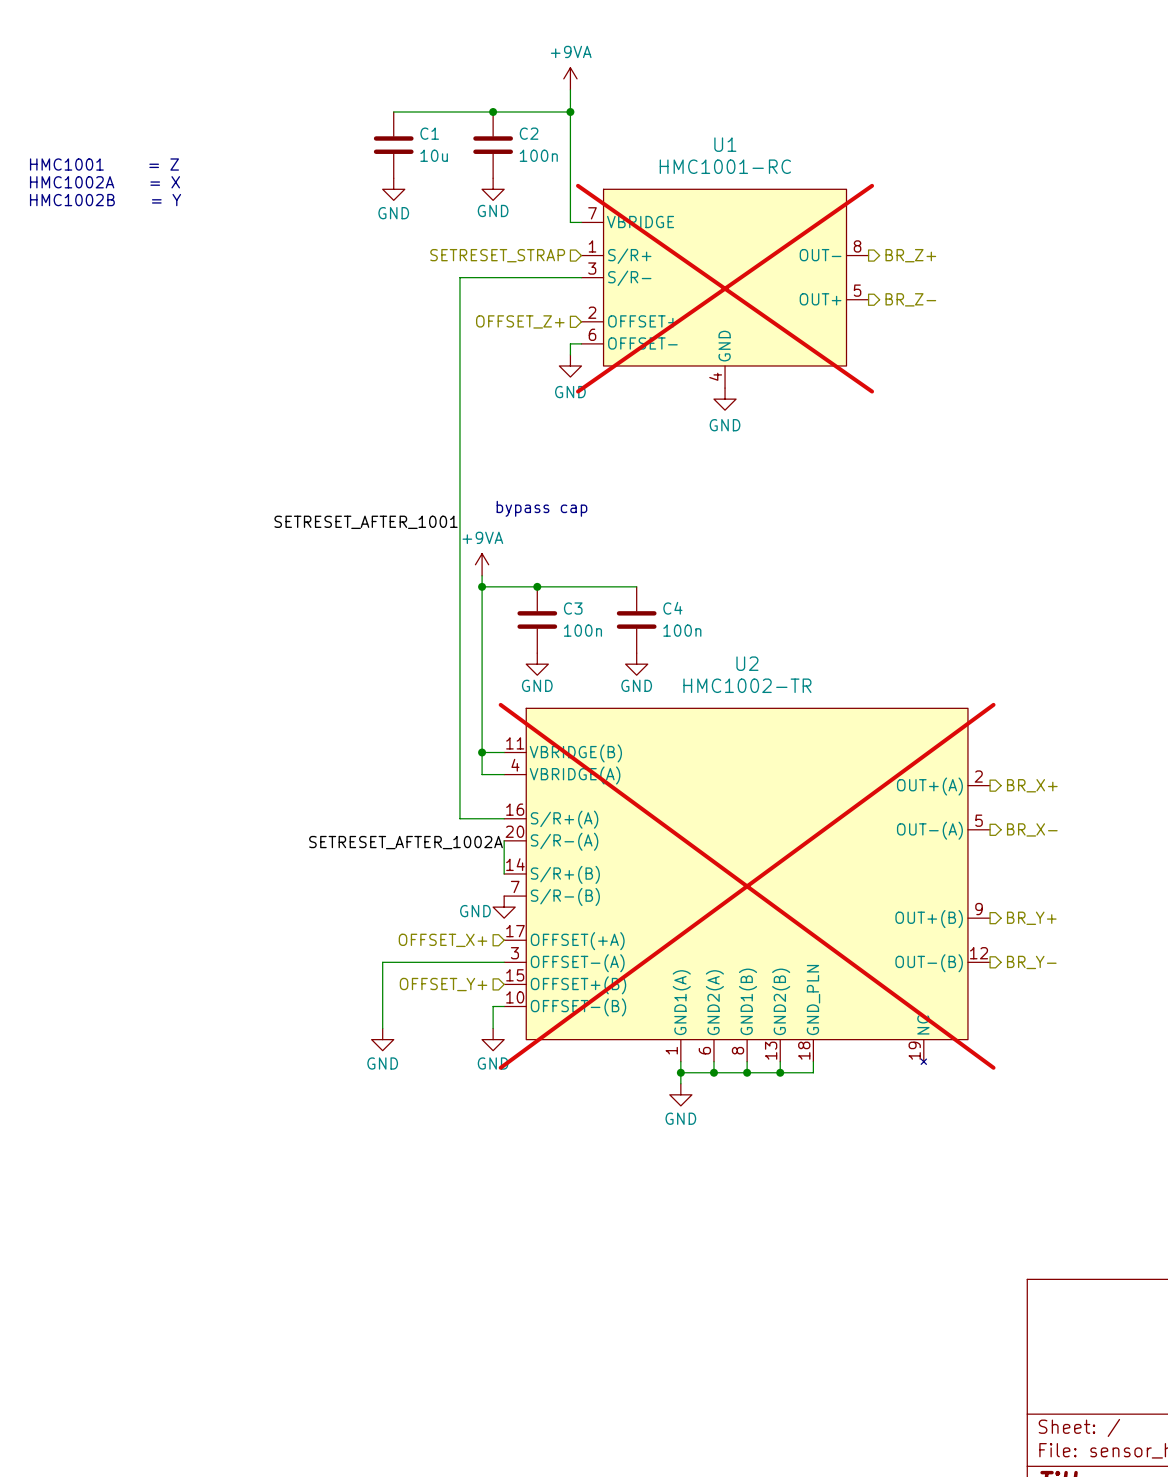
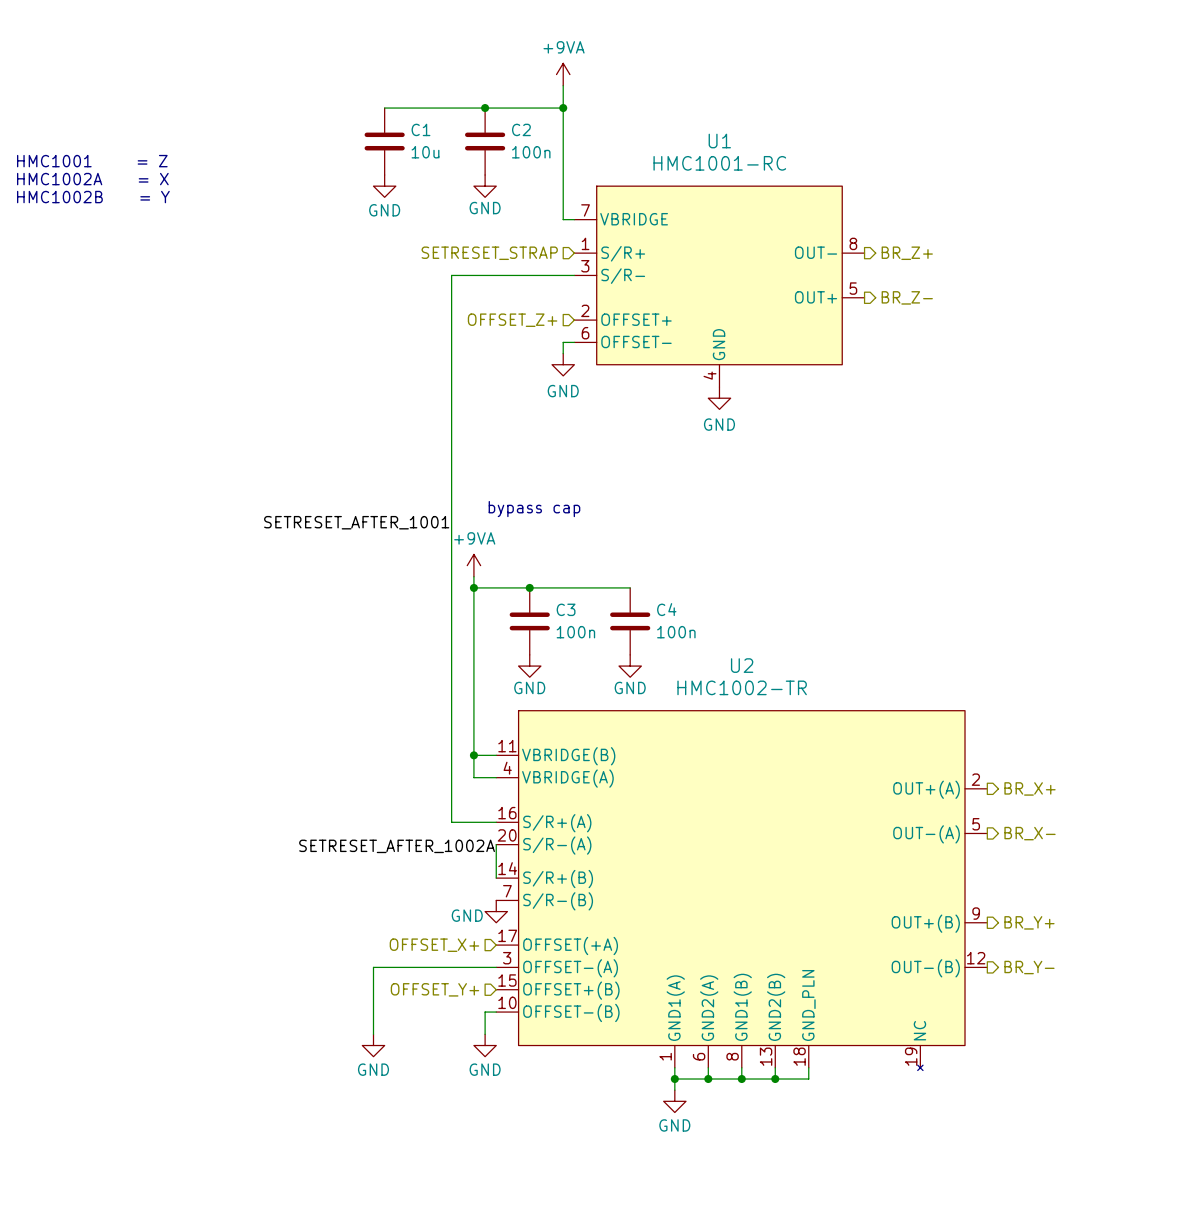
U1 do-not-place cross: (725, 288) -> none
U2 do-not-place cross: (747, 886) -> none

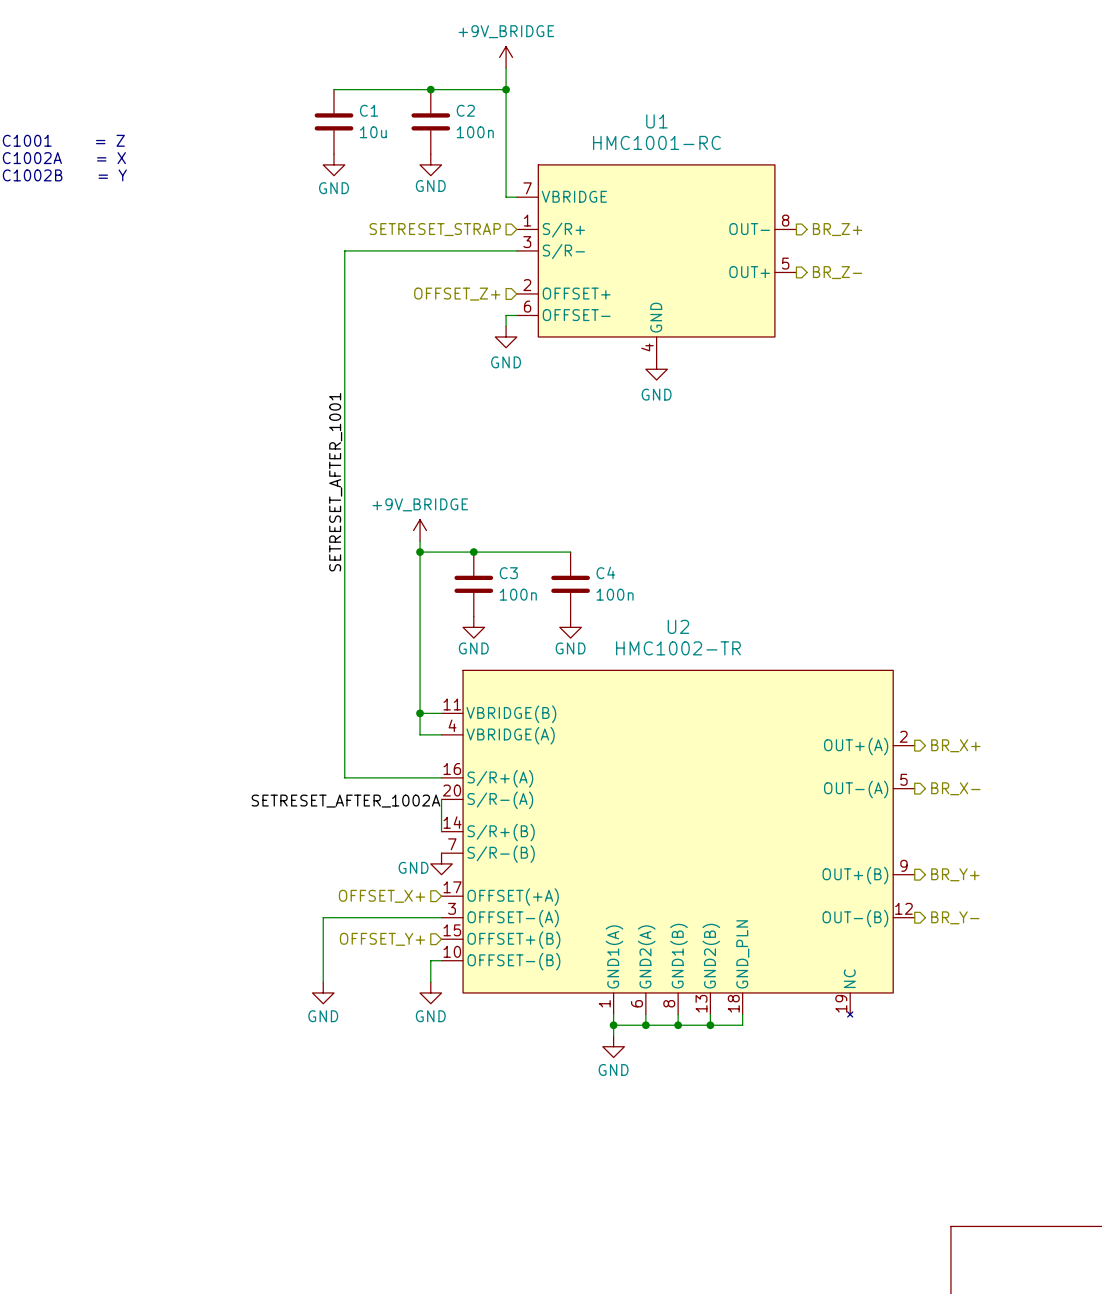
power symbol: +9VA (563, 74) -> +9V_BRIDGE (506, 57)
wire: (451, 275) (451, 822) -> (398, 250) (344, 250) (344, 777) (398, 777)
text: bypass cap (534, 509) -> none
label rotation: 0° (356, 522) -> 90° counterclockwise (335, 482)
power symbol: +9VA (473, 565) -> +9V_BRIDGE (420, 530)

